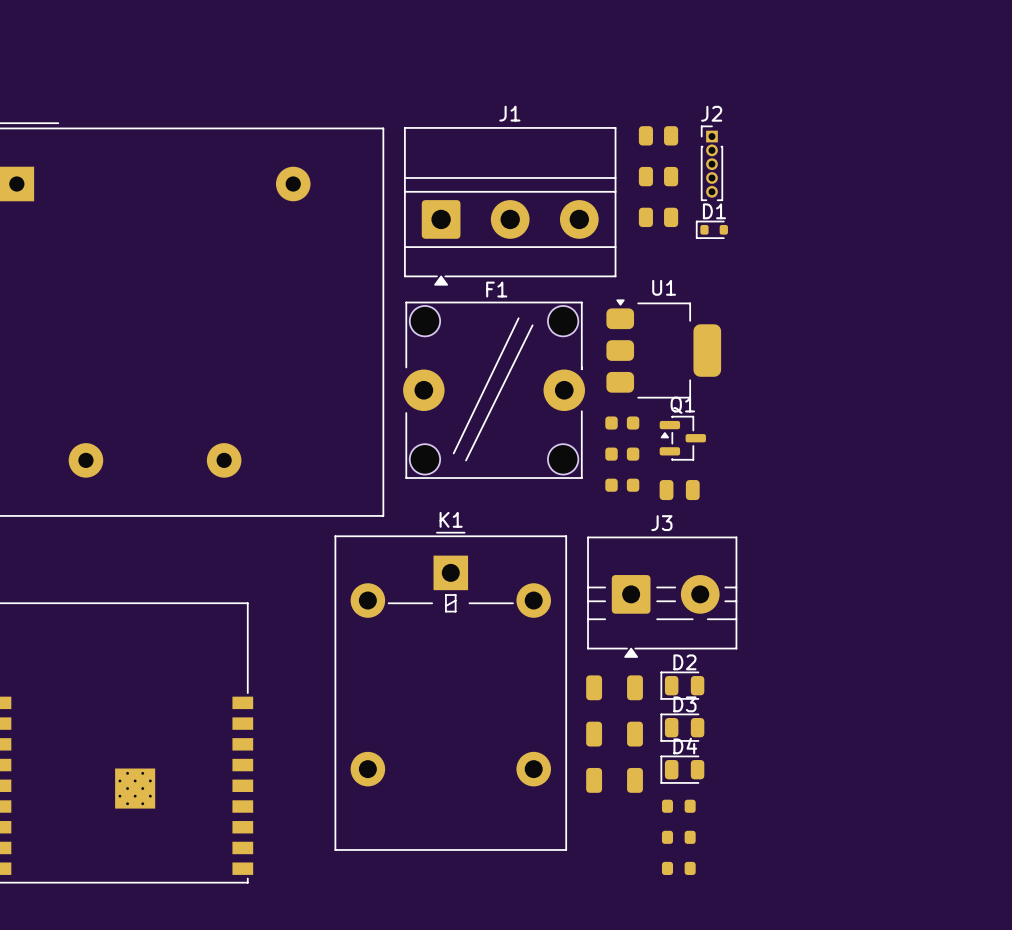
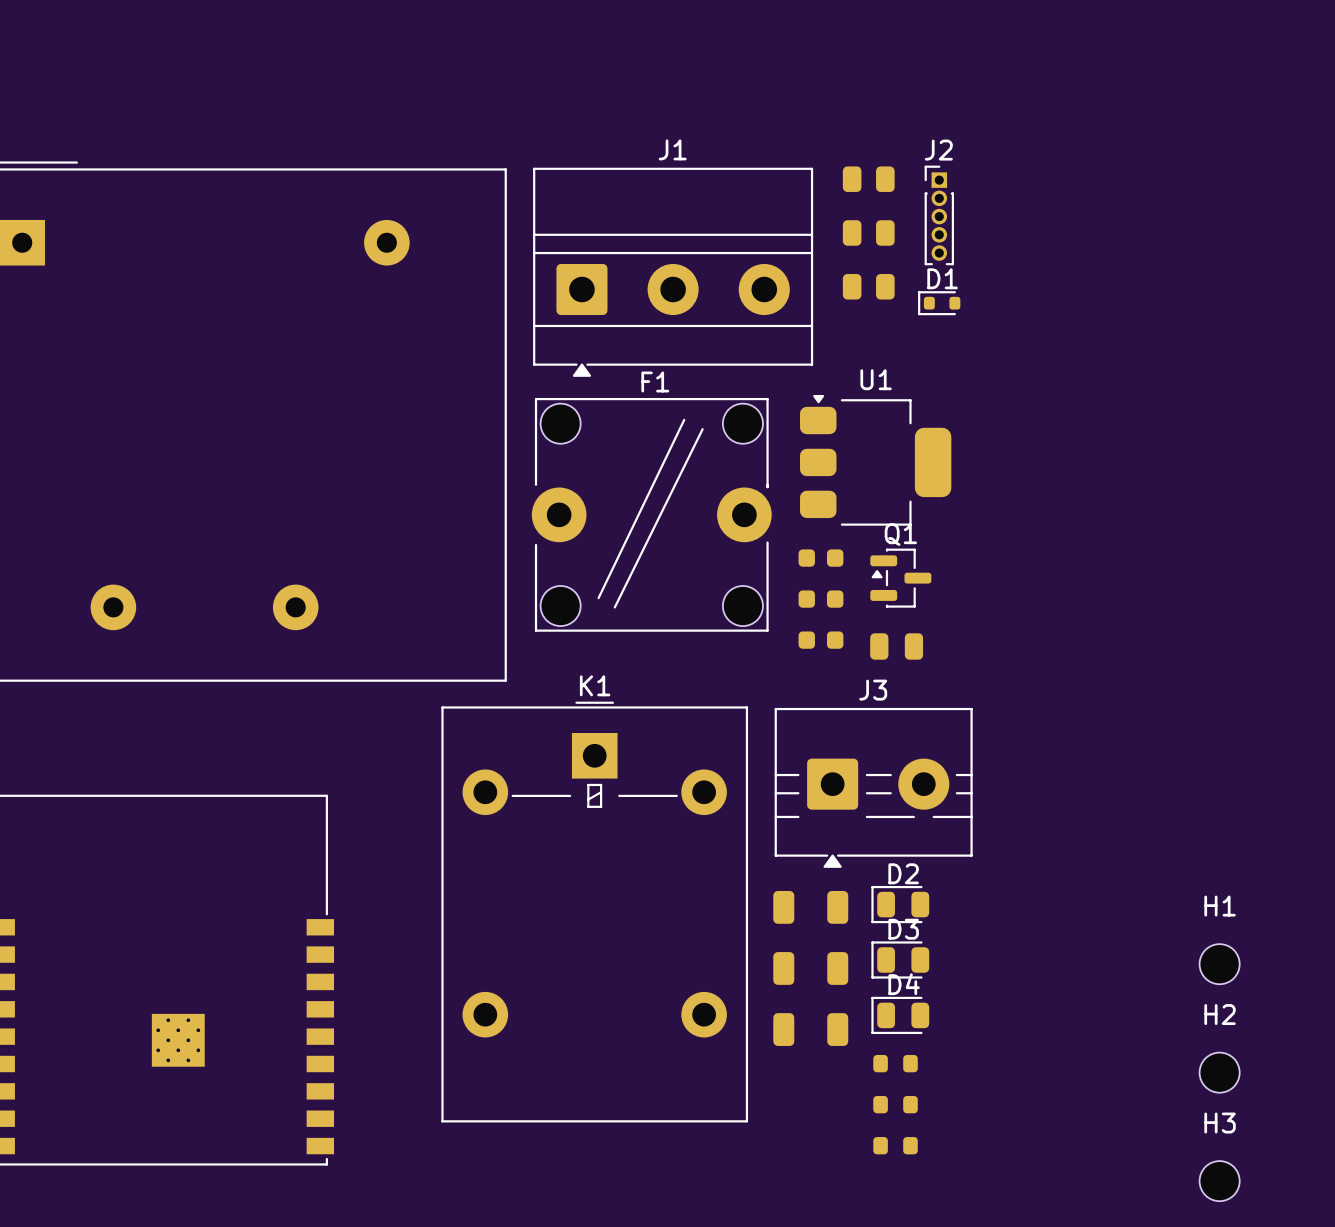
H1: none -> (1219, 964)
H2: none -> (1219, 1072)
H3: none -> (1219, 1181)

